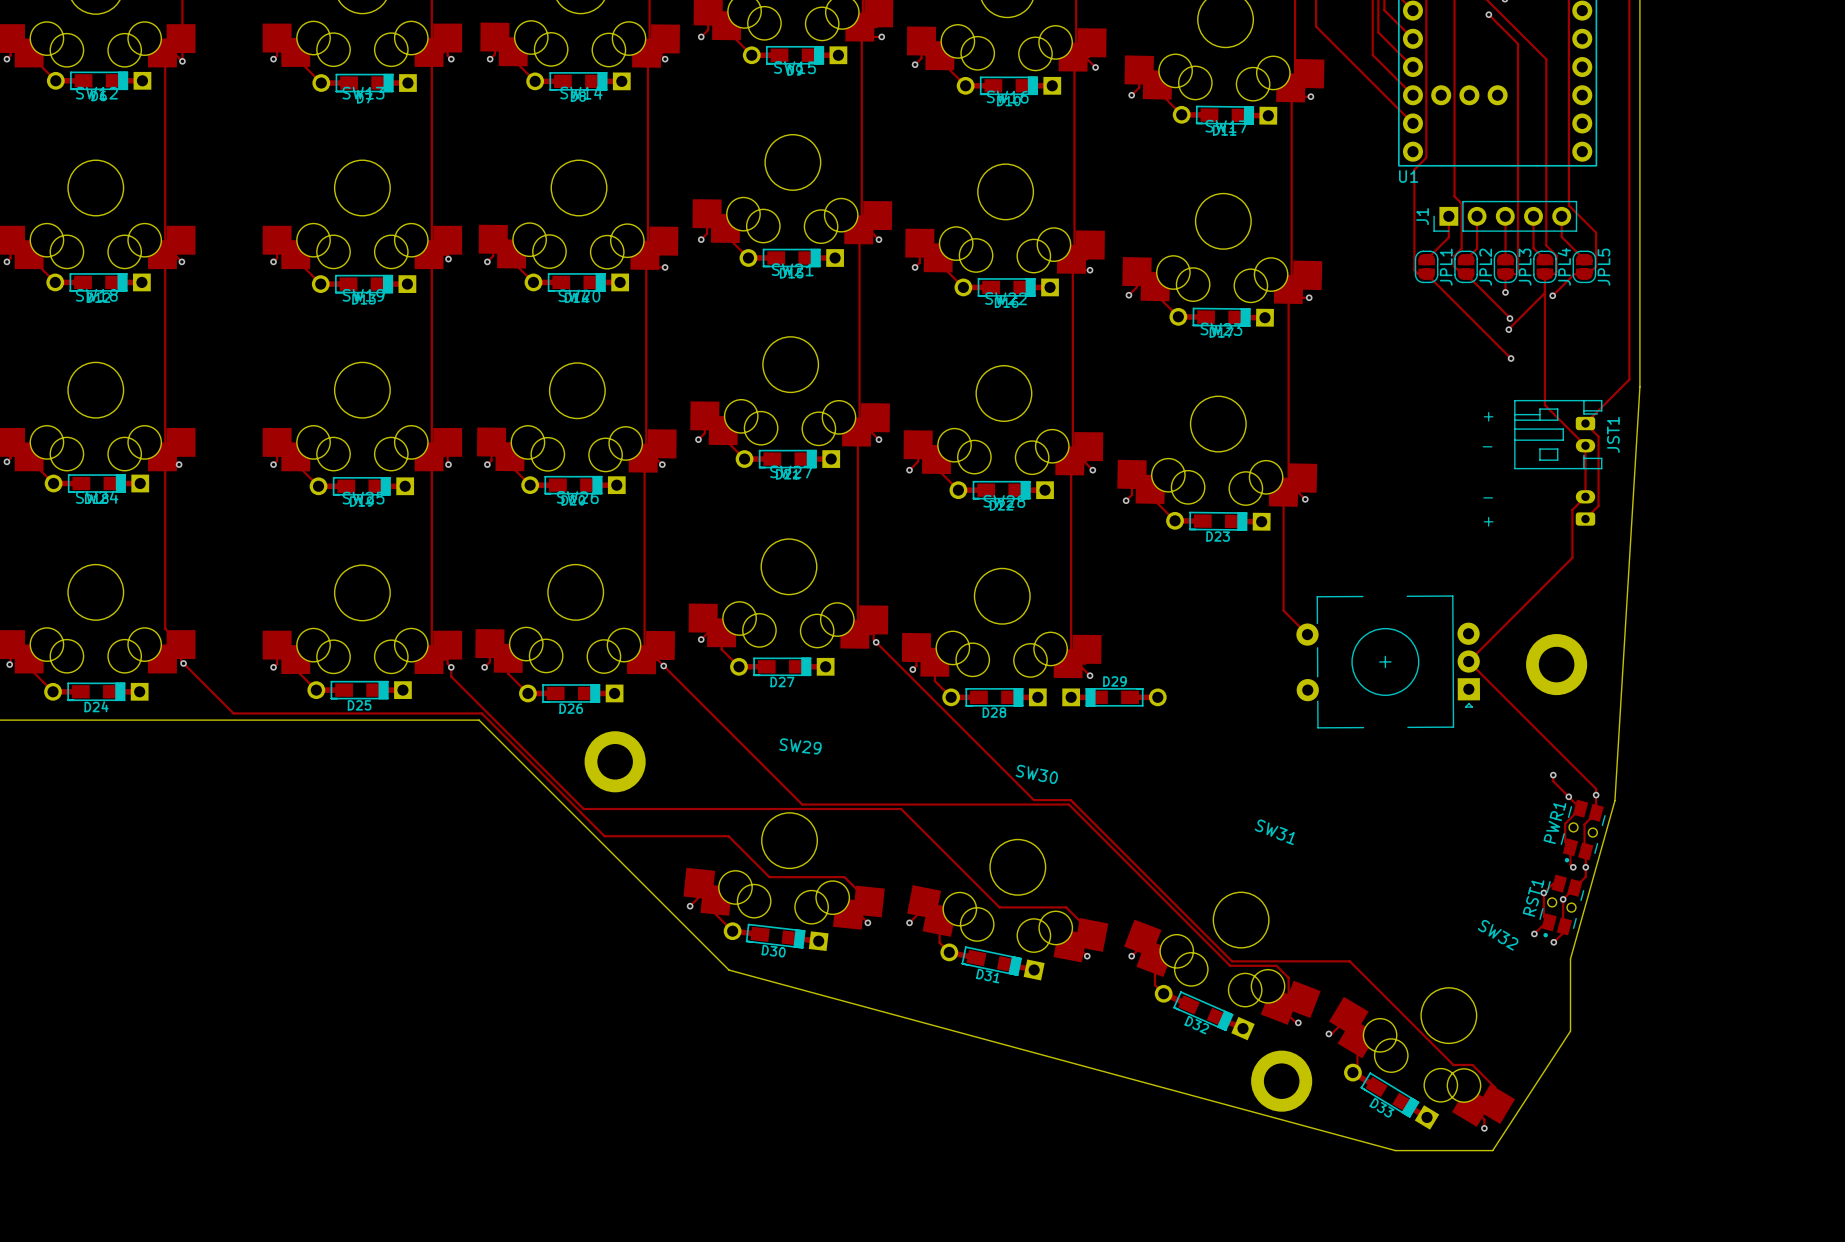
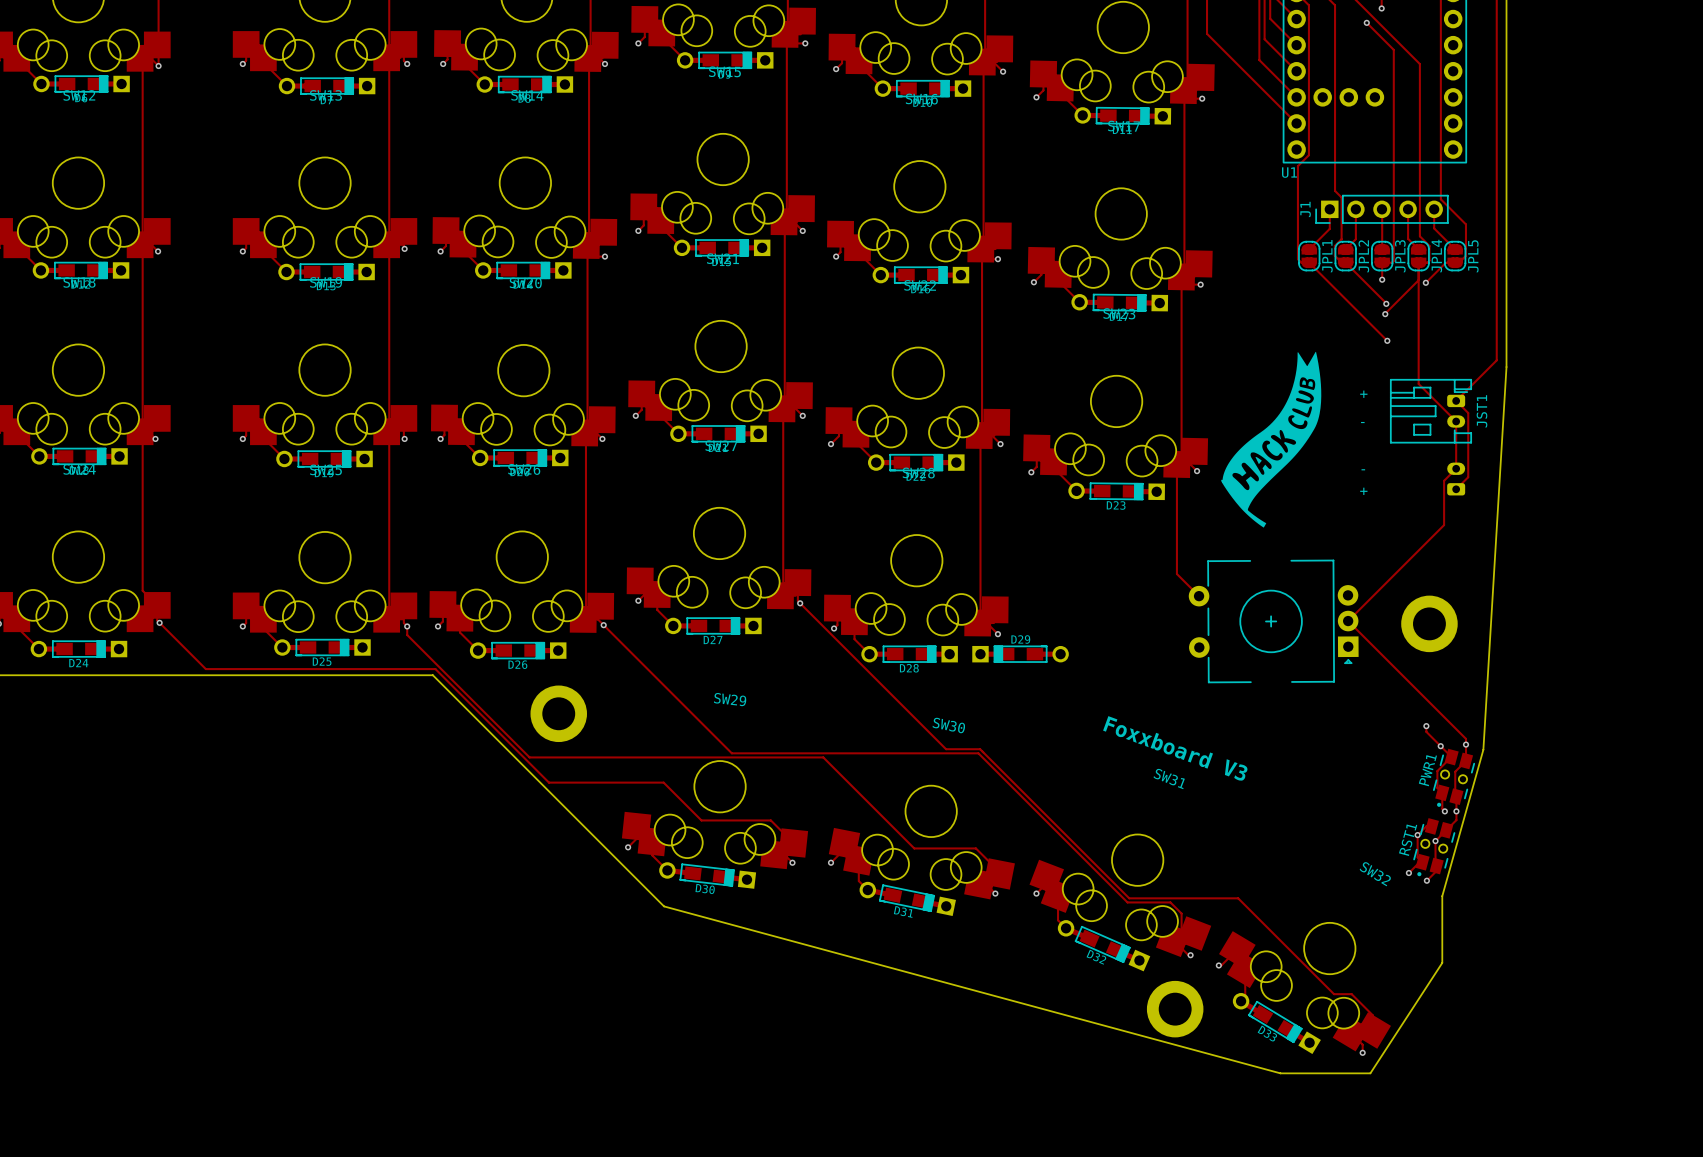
drawing: none -> [1221, 351, 1322, 528]
text: none -> Foxxboard V3 (1175, 748)

